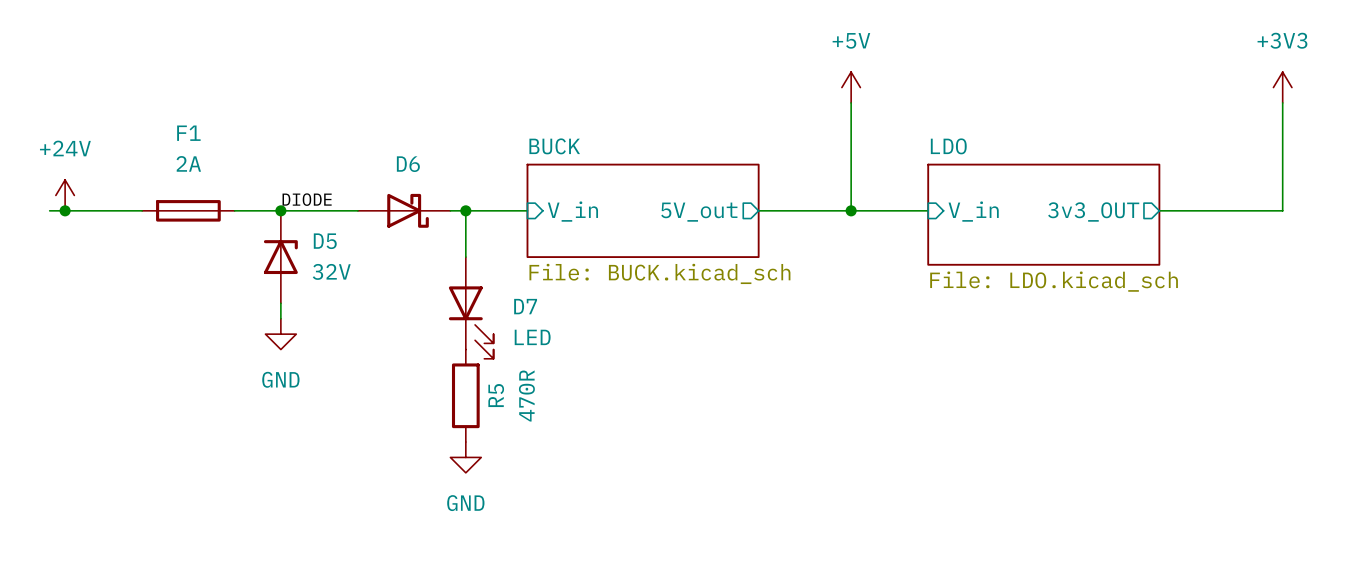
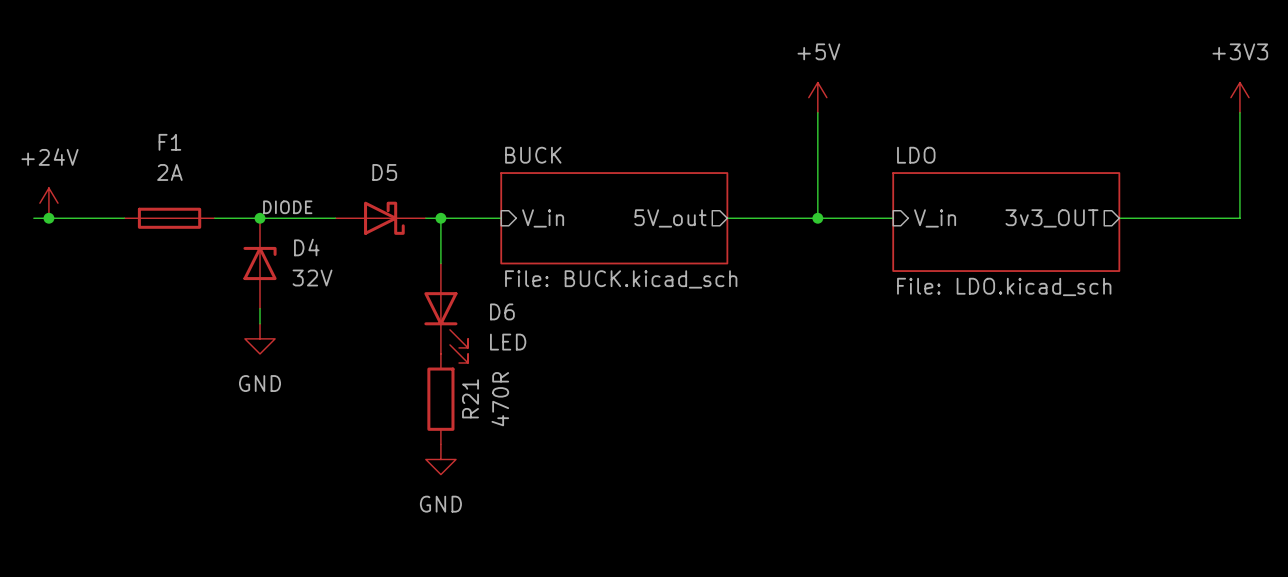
D6 name: D6 (408, 164) -> D5 (384, 172)
D5 name: D5 (325, 241) -> D4 (306, 247)
D7 name: D7 (525, 306) -> D6 (502, 311)
R5 name: R5 (496, 395) -> R21 (470, 398)

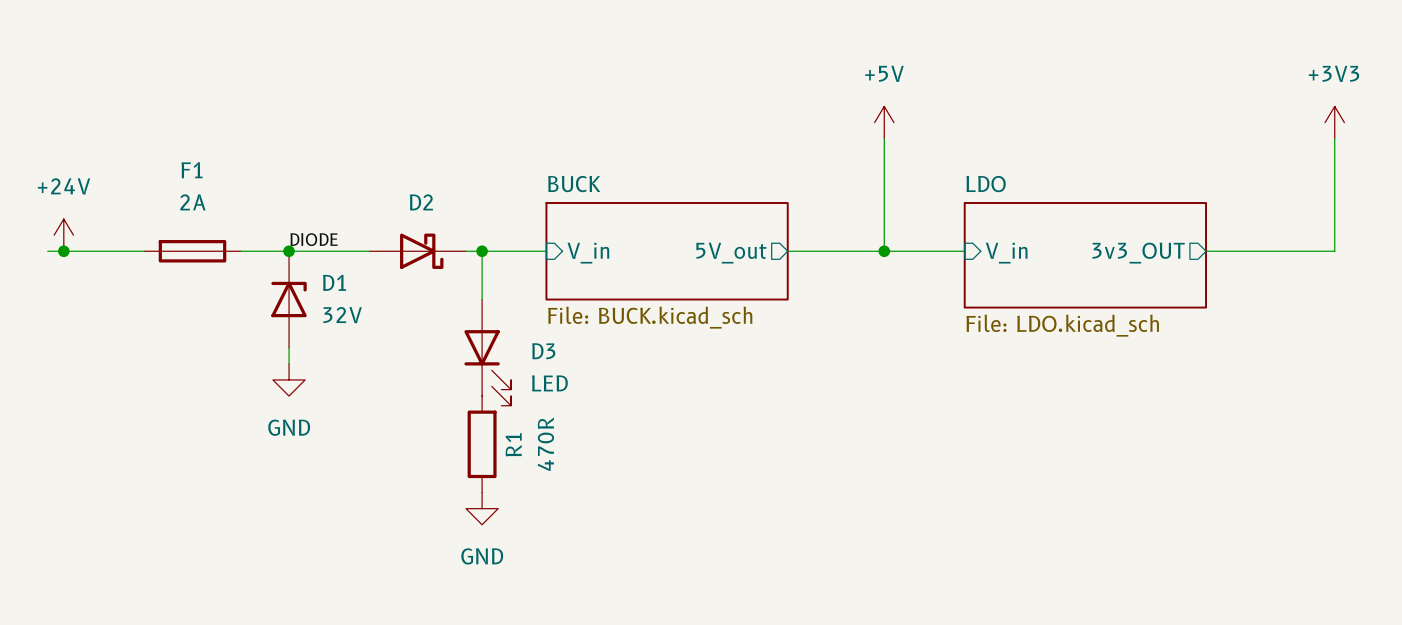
D5 name: D5 (384, 172) -> D2 (421, 202)
D4 name: D4 (306, 247) -> D1 (334, 282)
D6 name: D6 (502, 311) -> D3 (543, 351)
R21 name: R21 (470, 398) -> R1 (513, 444)

